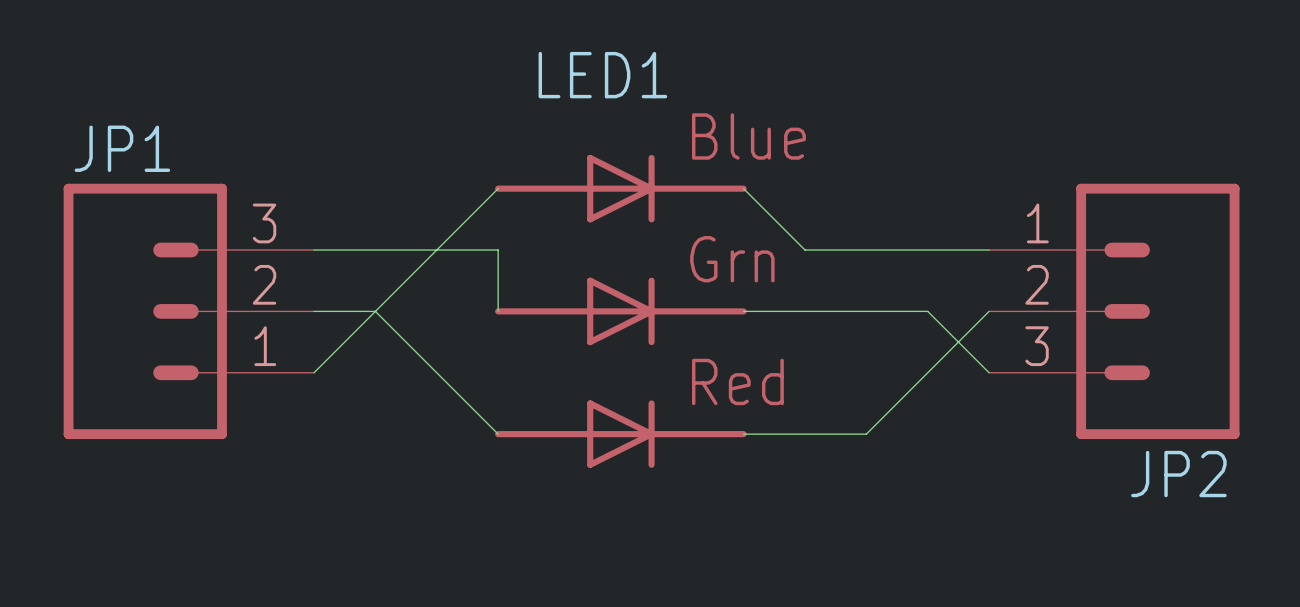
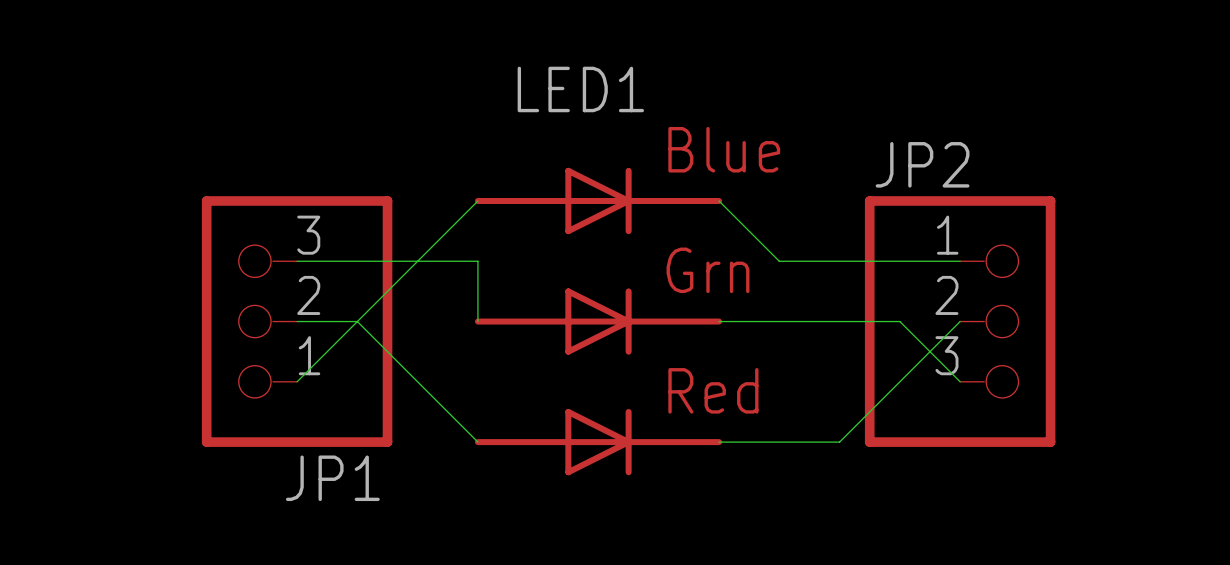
JP1 name position: JP1 (122, 148) -> JP1 (332, 478)
JP1 symbol: [63, 183, 315, 440] -> [201, 196, 393, 447]
JP2 symbol: [989, 183, 1240, 440] -> [864, 196, 1056, 447]
JP2 name position: JP2 (1178, 474) -> JP2 (922, 164)

